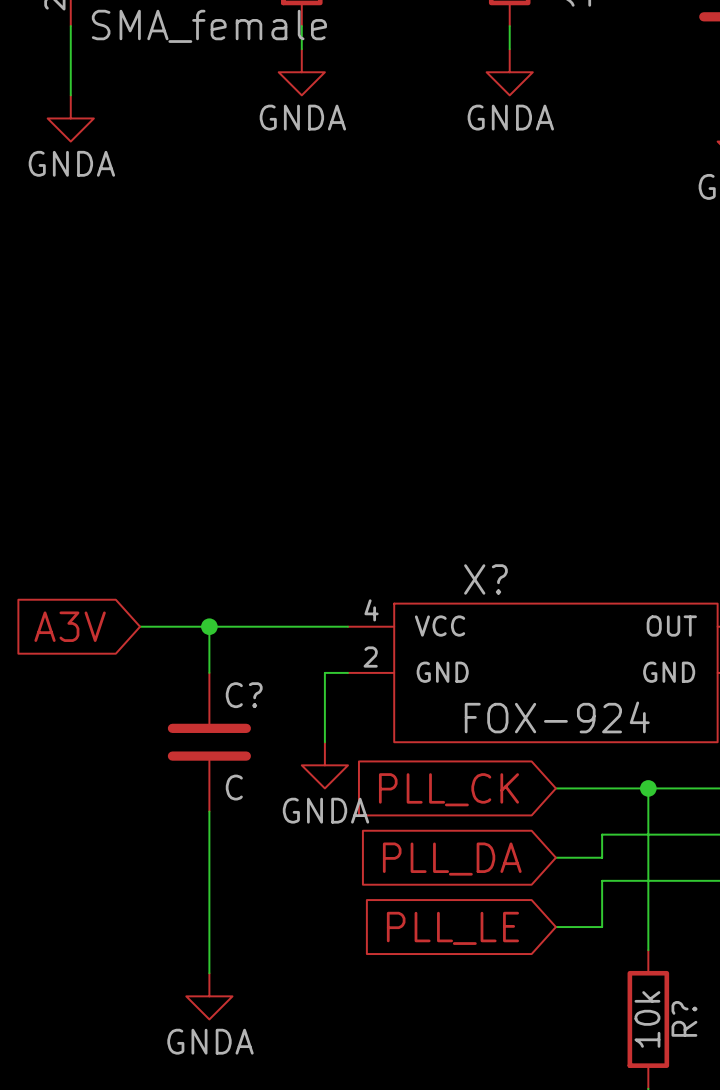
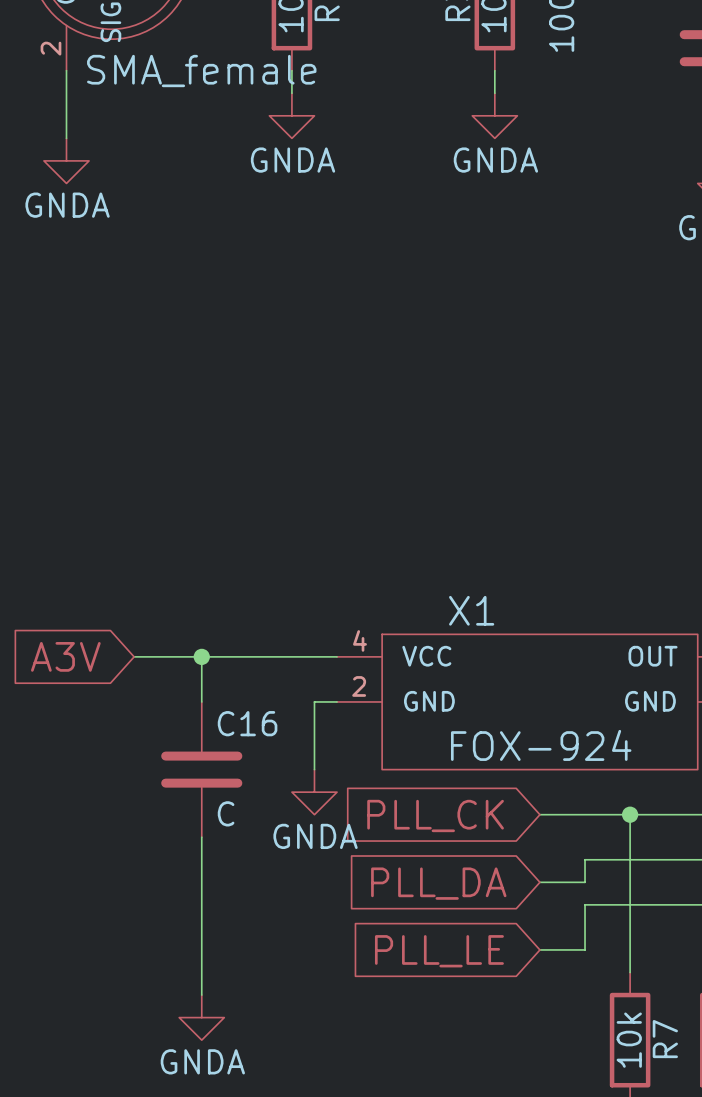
X? name: X? (485, 579) -> X1 (471, 610)
C? name: C? (244, 695) -> C16 (247, 723)
R? name: R? (684, 1018) -> R7 (665, 1039)

